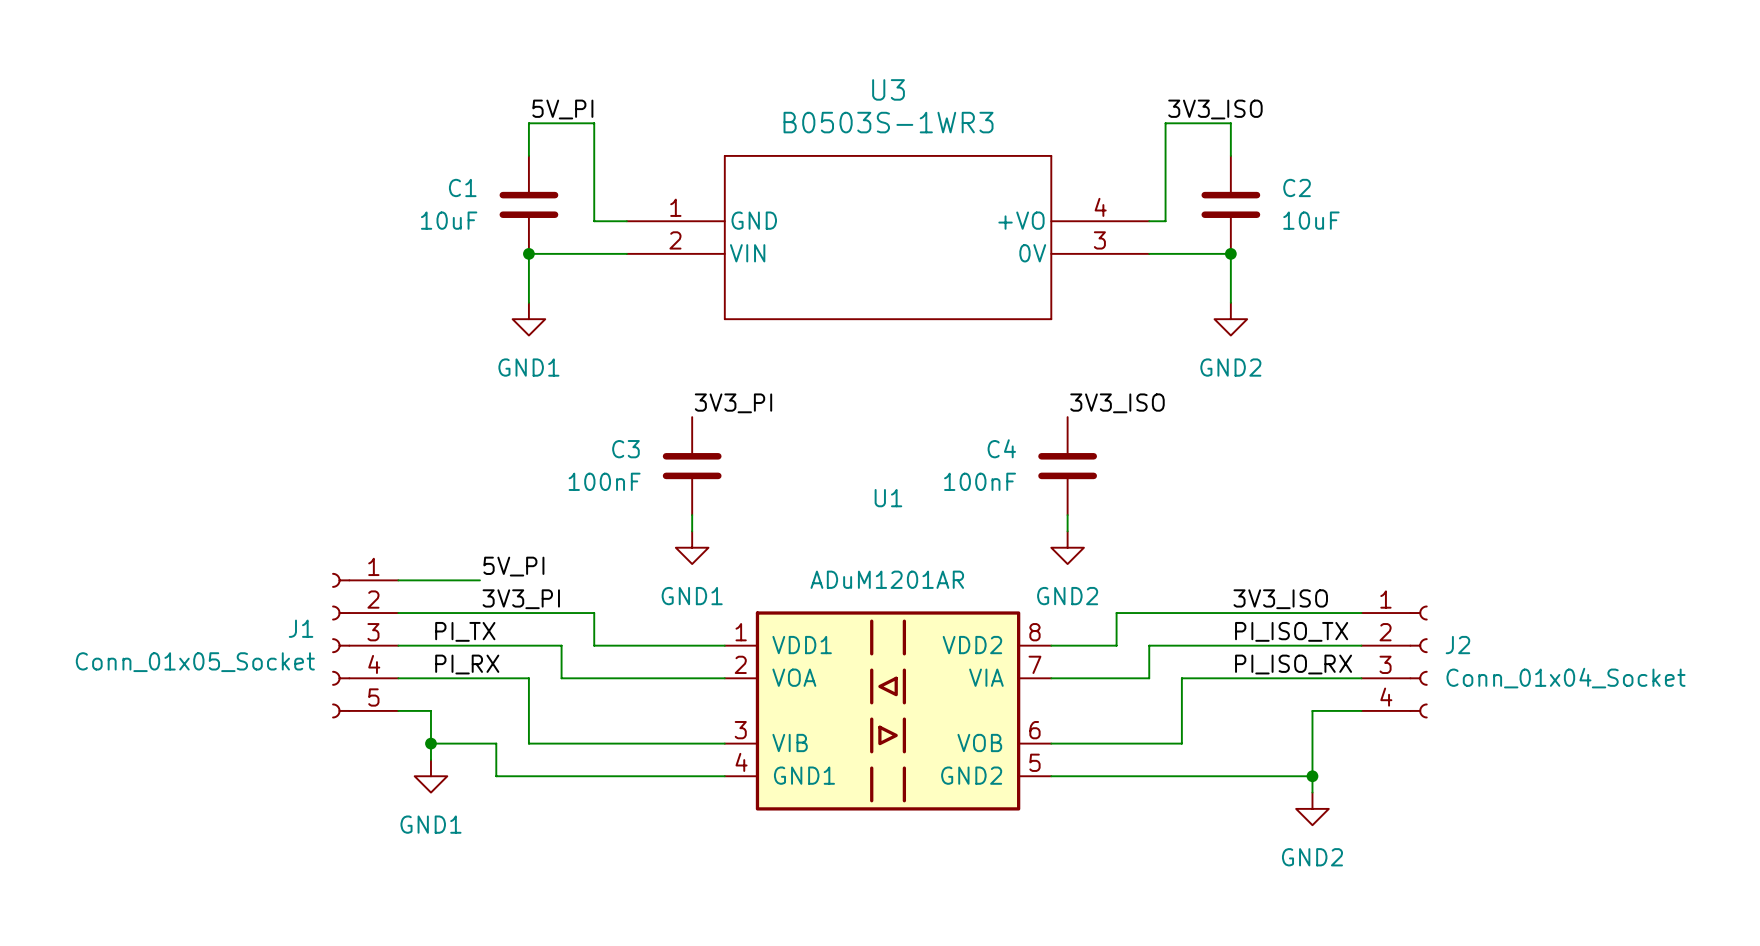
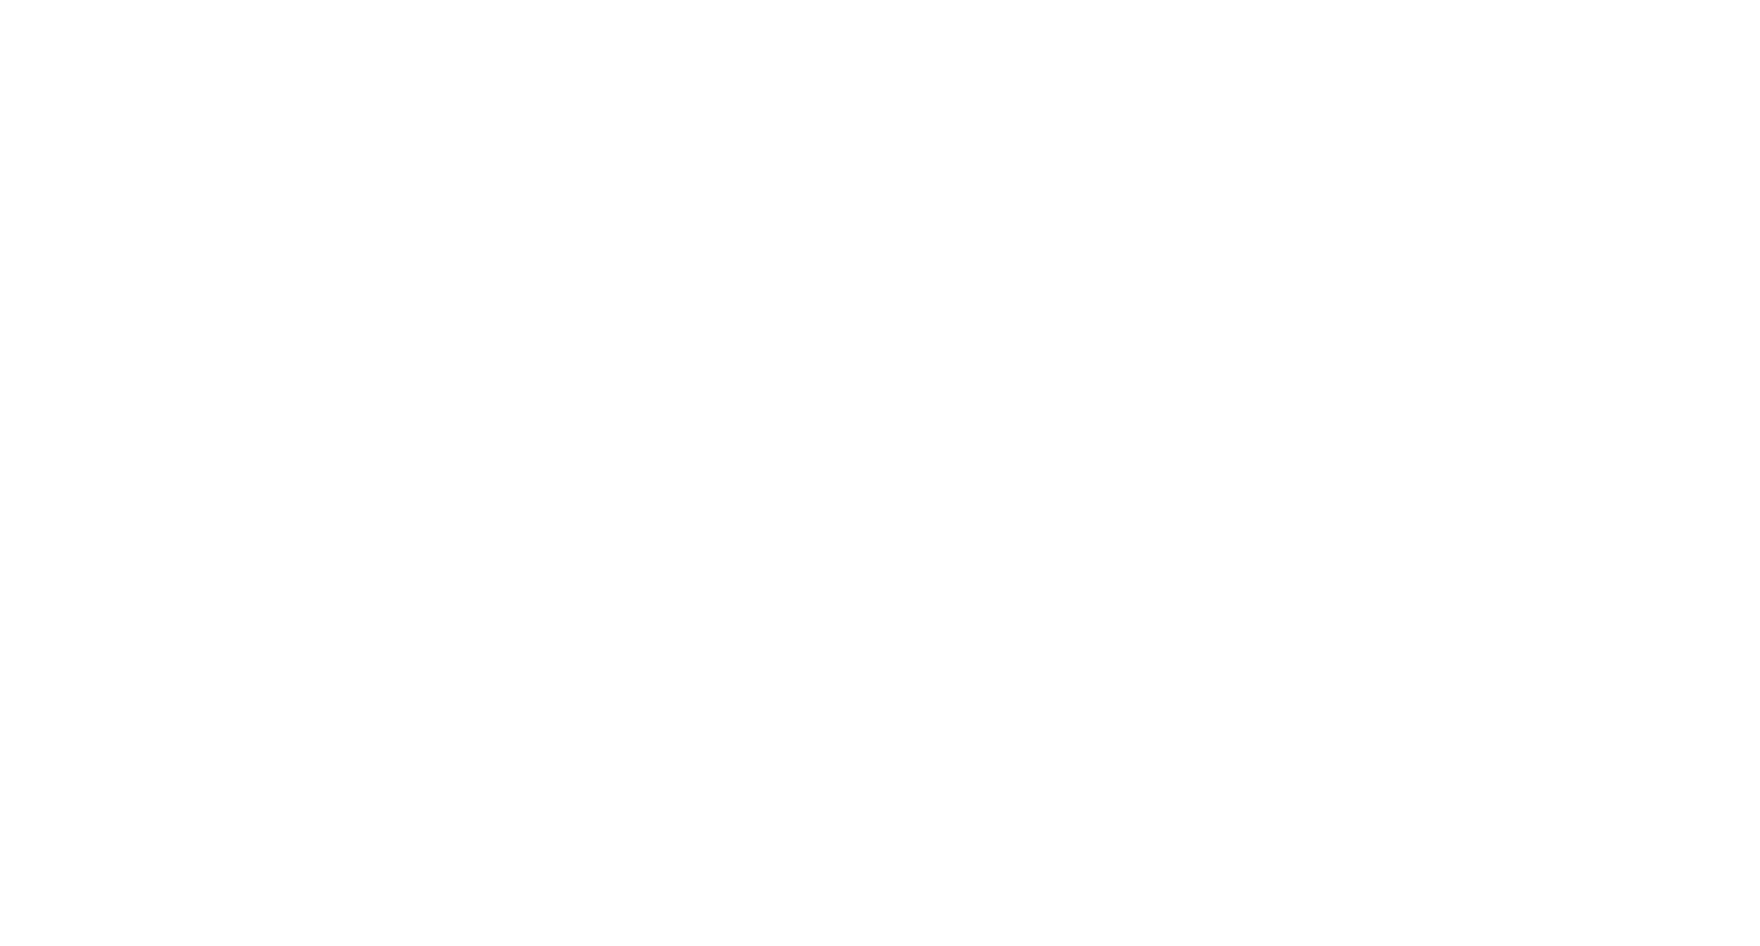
label: 5V_PI (562, 109) -> none
label: 3V3_ISO (1215, 109) -> none
wire: (528, 155) (528, 123) (594, 123) (594, 221) (626, 221) -> none
wire: (1230, 155) (1230, 123) (1165, 123) (1165, 221) (1149, 221) -> none
C1: 10uF (528, 204) -> none
C2: 10uF (1230, 204) -> none
U3: B0503S-1WR3 (888, 237) -> none
junction: (528, 253) -> none
wire: (626, 253) (528, 253) (528, 302) -> none
wire: (1149, 253) (1230, 253) (1230, 302) -> none
junction: (1230, 253) -> none
power symbol: GND1 (528, 319) -> none
power symbol: GND2 (1230, 319) -> none
label: 3V3_PI (733, 403) -> none
label: 3V3_ISO (1117, 403) -> none
C3: 100nF (692, 466) -> none
C4: 100nF (1067, 466) -> none
wire: (692, 515) (692, 531) -> none
wire: (1067, 515) (1067, 531) -> none
power symbol: GND1 (692, 547) -> none
power symbol: GND2 (1067, 547) -> none
label: 5V_PI (513, 566) -> none
wire: (398, 580) (479, 580) -> none
label: 3V3_PI (521, 599) -> none
label: 3V3_ISO (1280, 599) -> none
wire: (398, 613) (594, 613) (594, 645) (724, 645) -> none
wire: (1361, 613) (1116, 613) (1116, 645) (1051, 645) -> none
label: PI_TX (465, 631) -> none
label: PI_ISO_TX (1291, 631) -> none
J1: Conn_01x05_Socket (365, 645) -> none
wire: (398, 645) (561, 645) (561, 678) (724, 678) -> none
wire: (1361, 645) (1149, 645) (1149, 678) (1051, 678) -> none
J2: Conn_01x04_Socket (1394, 661) -> none
label: PI_RX (467, 664) -> none
label: PI_ISO_RX (1293, 664) -> none
wire: (398, 678) (528, 678) (528, 743) (724, 743) -> none
wire: (1361, 678) (1181, 678) (1181, 743) (1051, 743) -> none
wire: (398, 710) (430, 710) (430, 759) -> none
U1: ADuM1201AR (888, 710) -> none
wire: (1361, 710) (1312, 710) (1312, 792) -> none
wire: (430, 743) (496, 743) (496, 776) (724, 776) -> none
junction: (430, 743) -> none
power symbol: GND1 (430, 776) -> none
wire: (1051, 776) (1312, 776) -> none
junction: (1312, 776) -> none
power symbol: GND2 (1312, 808) -> none

